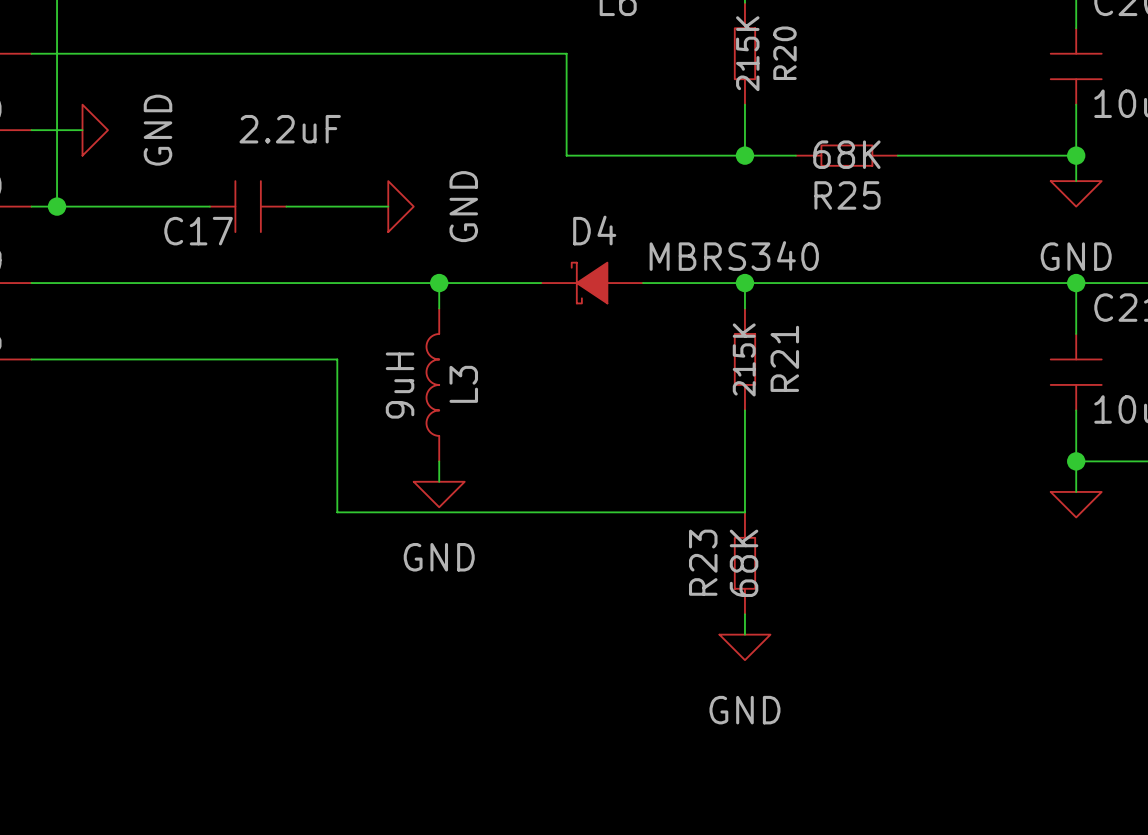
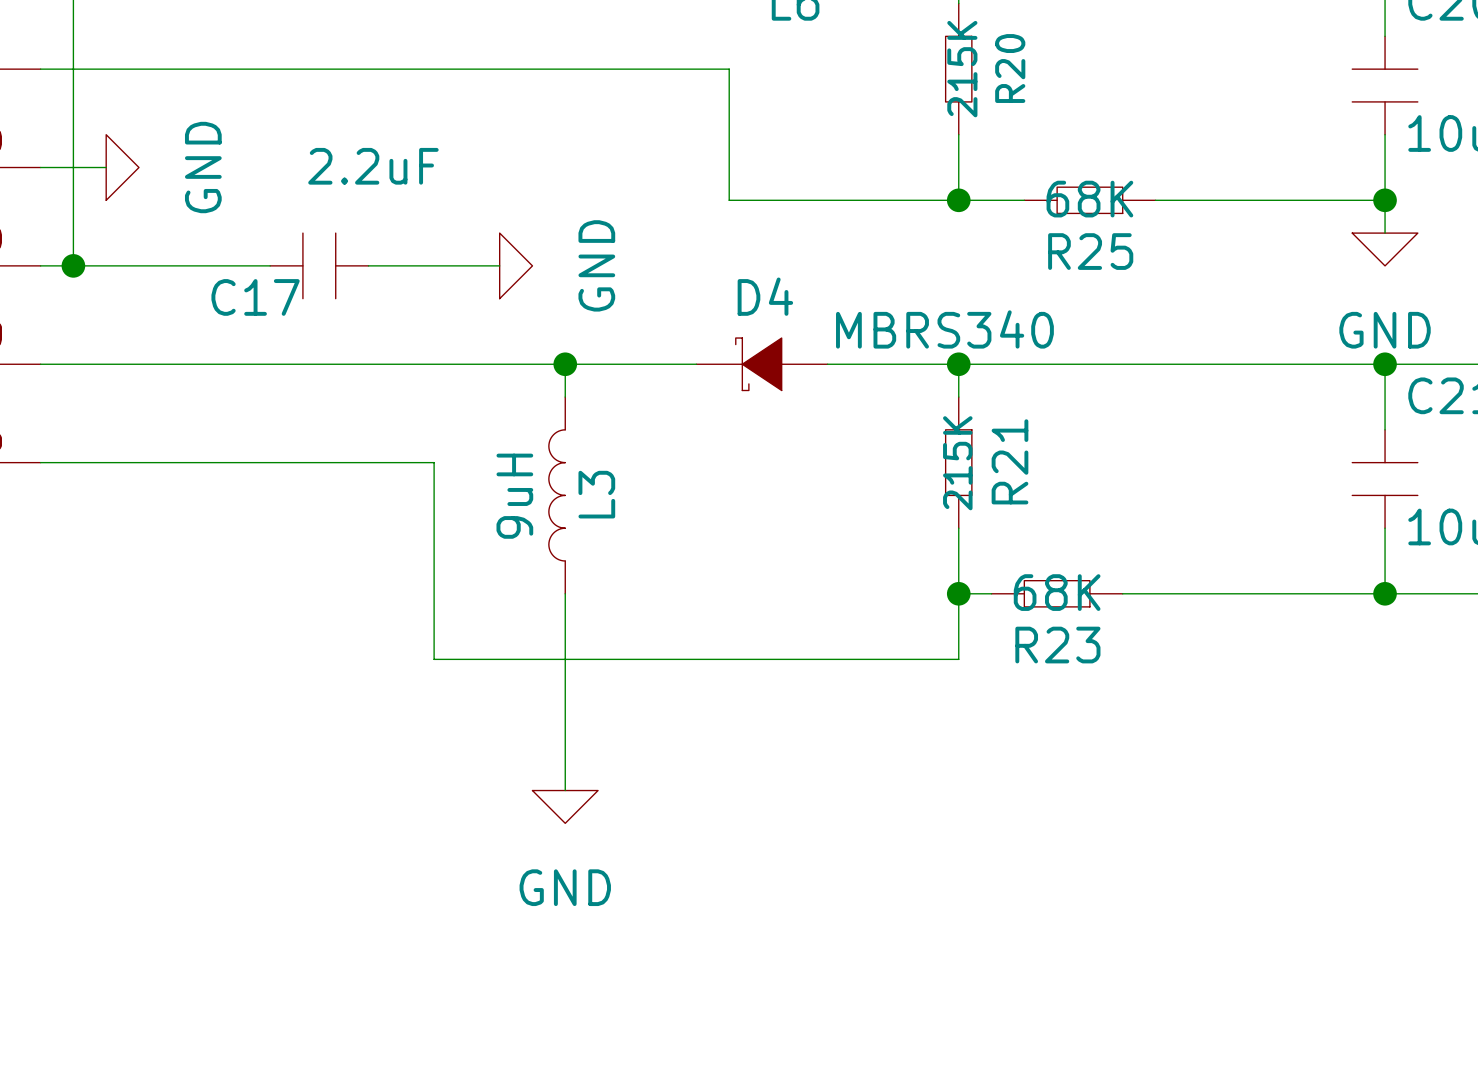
wire: none -> (958, 593) (991, 593)
junction: none -> (958, 593)
wire: (1076, 461) (1076, 491) -> (1385, 593) (1122, 593)
wire: none -> (565, 620) (565, 790)
power symbol position: GND (439, 494) -> GND (565, 806)
power symbol: (1076, 504) -> none
R23 name position: R23 (703, 562) -> R23 (1057, 645)
R23 rotation: 0° (744, 563) -> 90° clockwise (1057, 593)
R23 position: (744, 563) -> (1057, 593)
wire: (744, 614) (744, 634) -> none
power symbol: GND (744, 647) -> none

